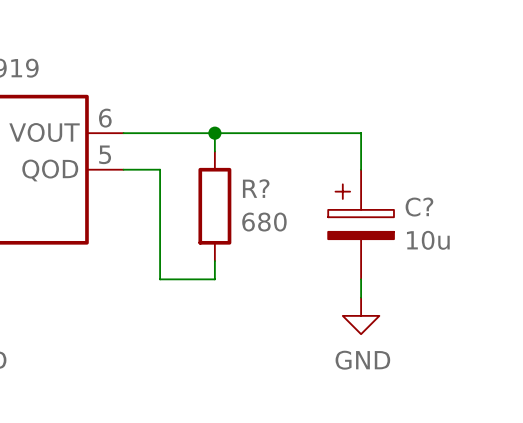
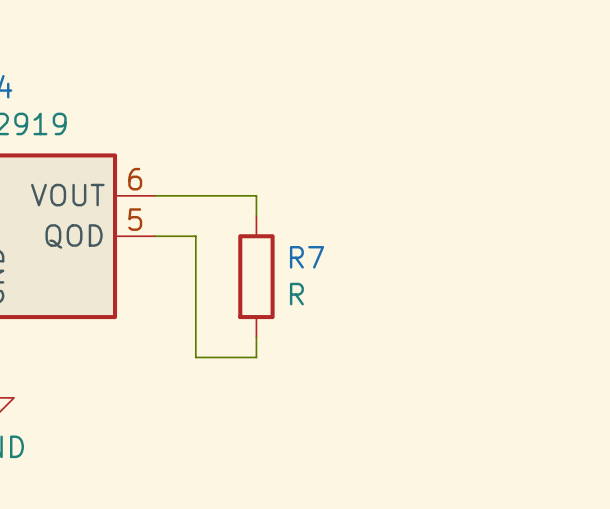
wire: (214, 133) (361, 133) (361, 169) -> none
junction: (214, 133) -> none
R? name: R? (256, 188) -> R7 (307, 257)
R? value: 680 (264, 222) -> R (296, 294)
C?: 10u (361, 224) -> none
wire: (361, 279) (361, 297) -> none
power symbol: GND (361, 315) -> none

